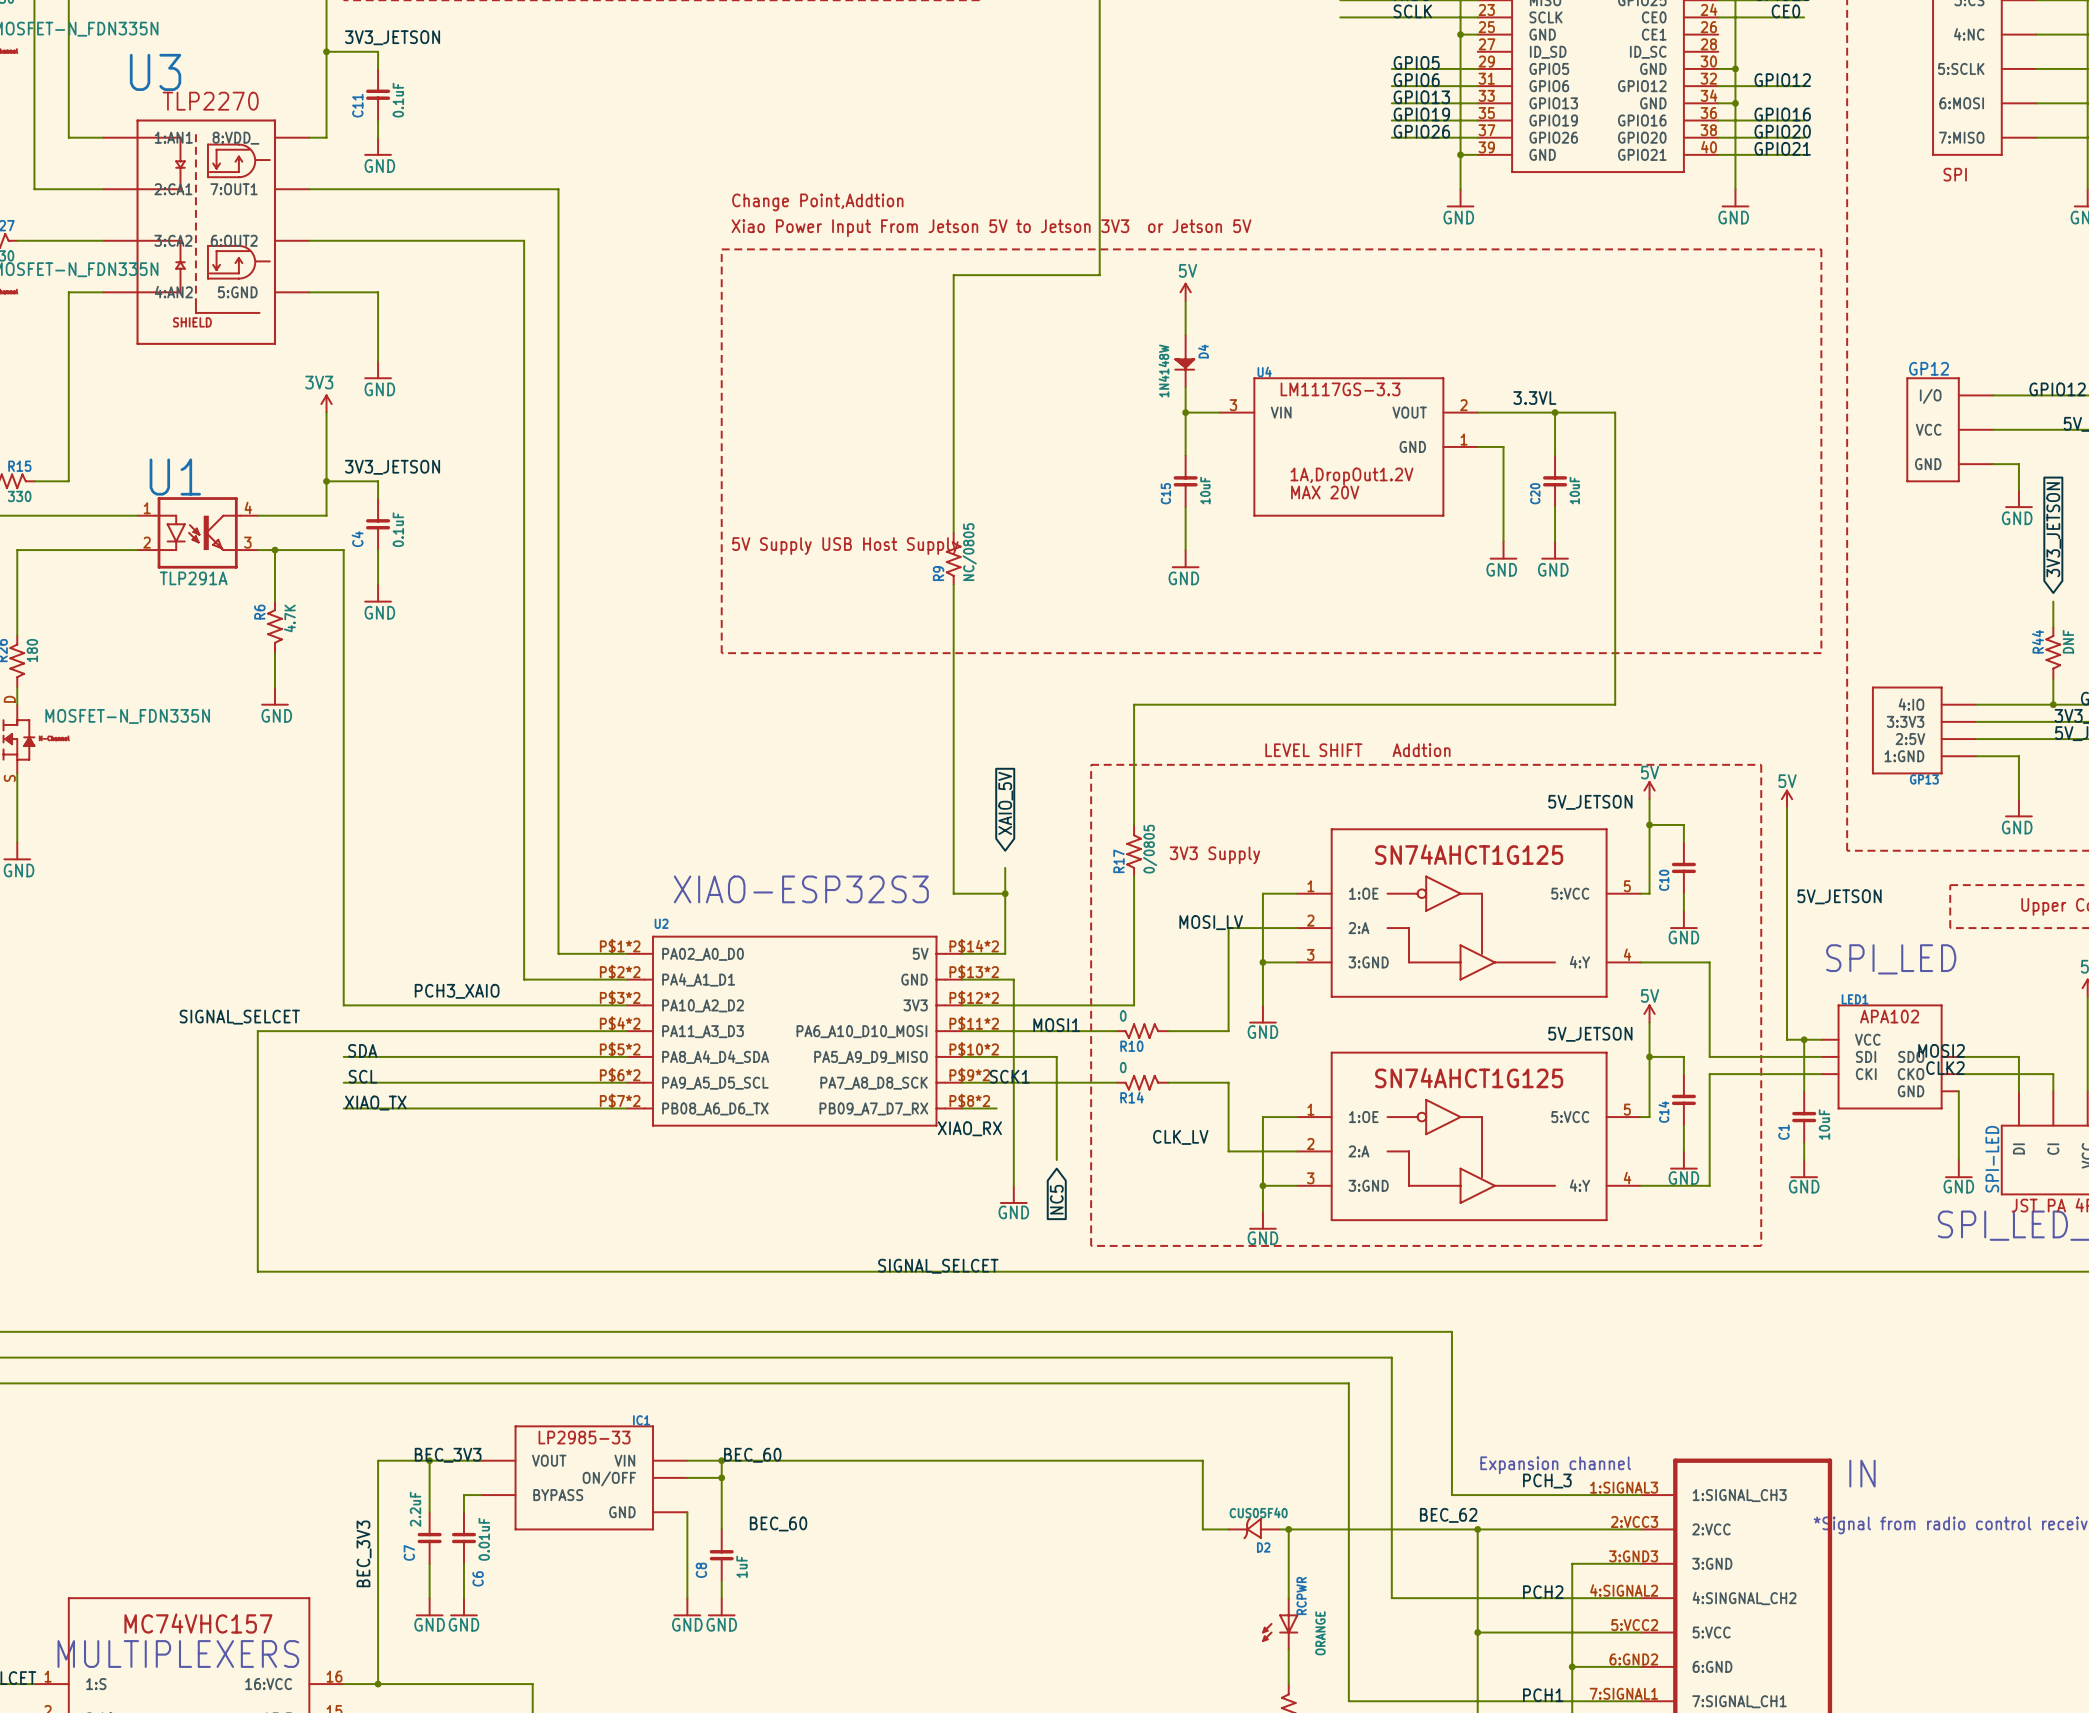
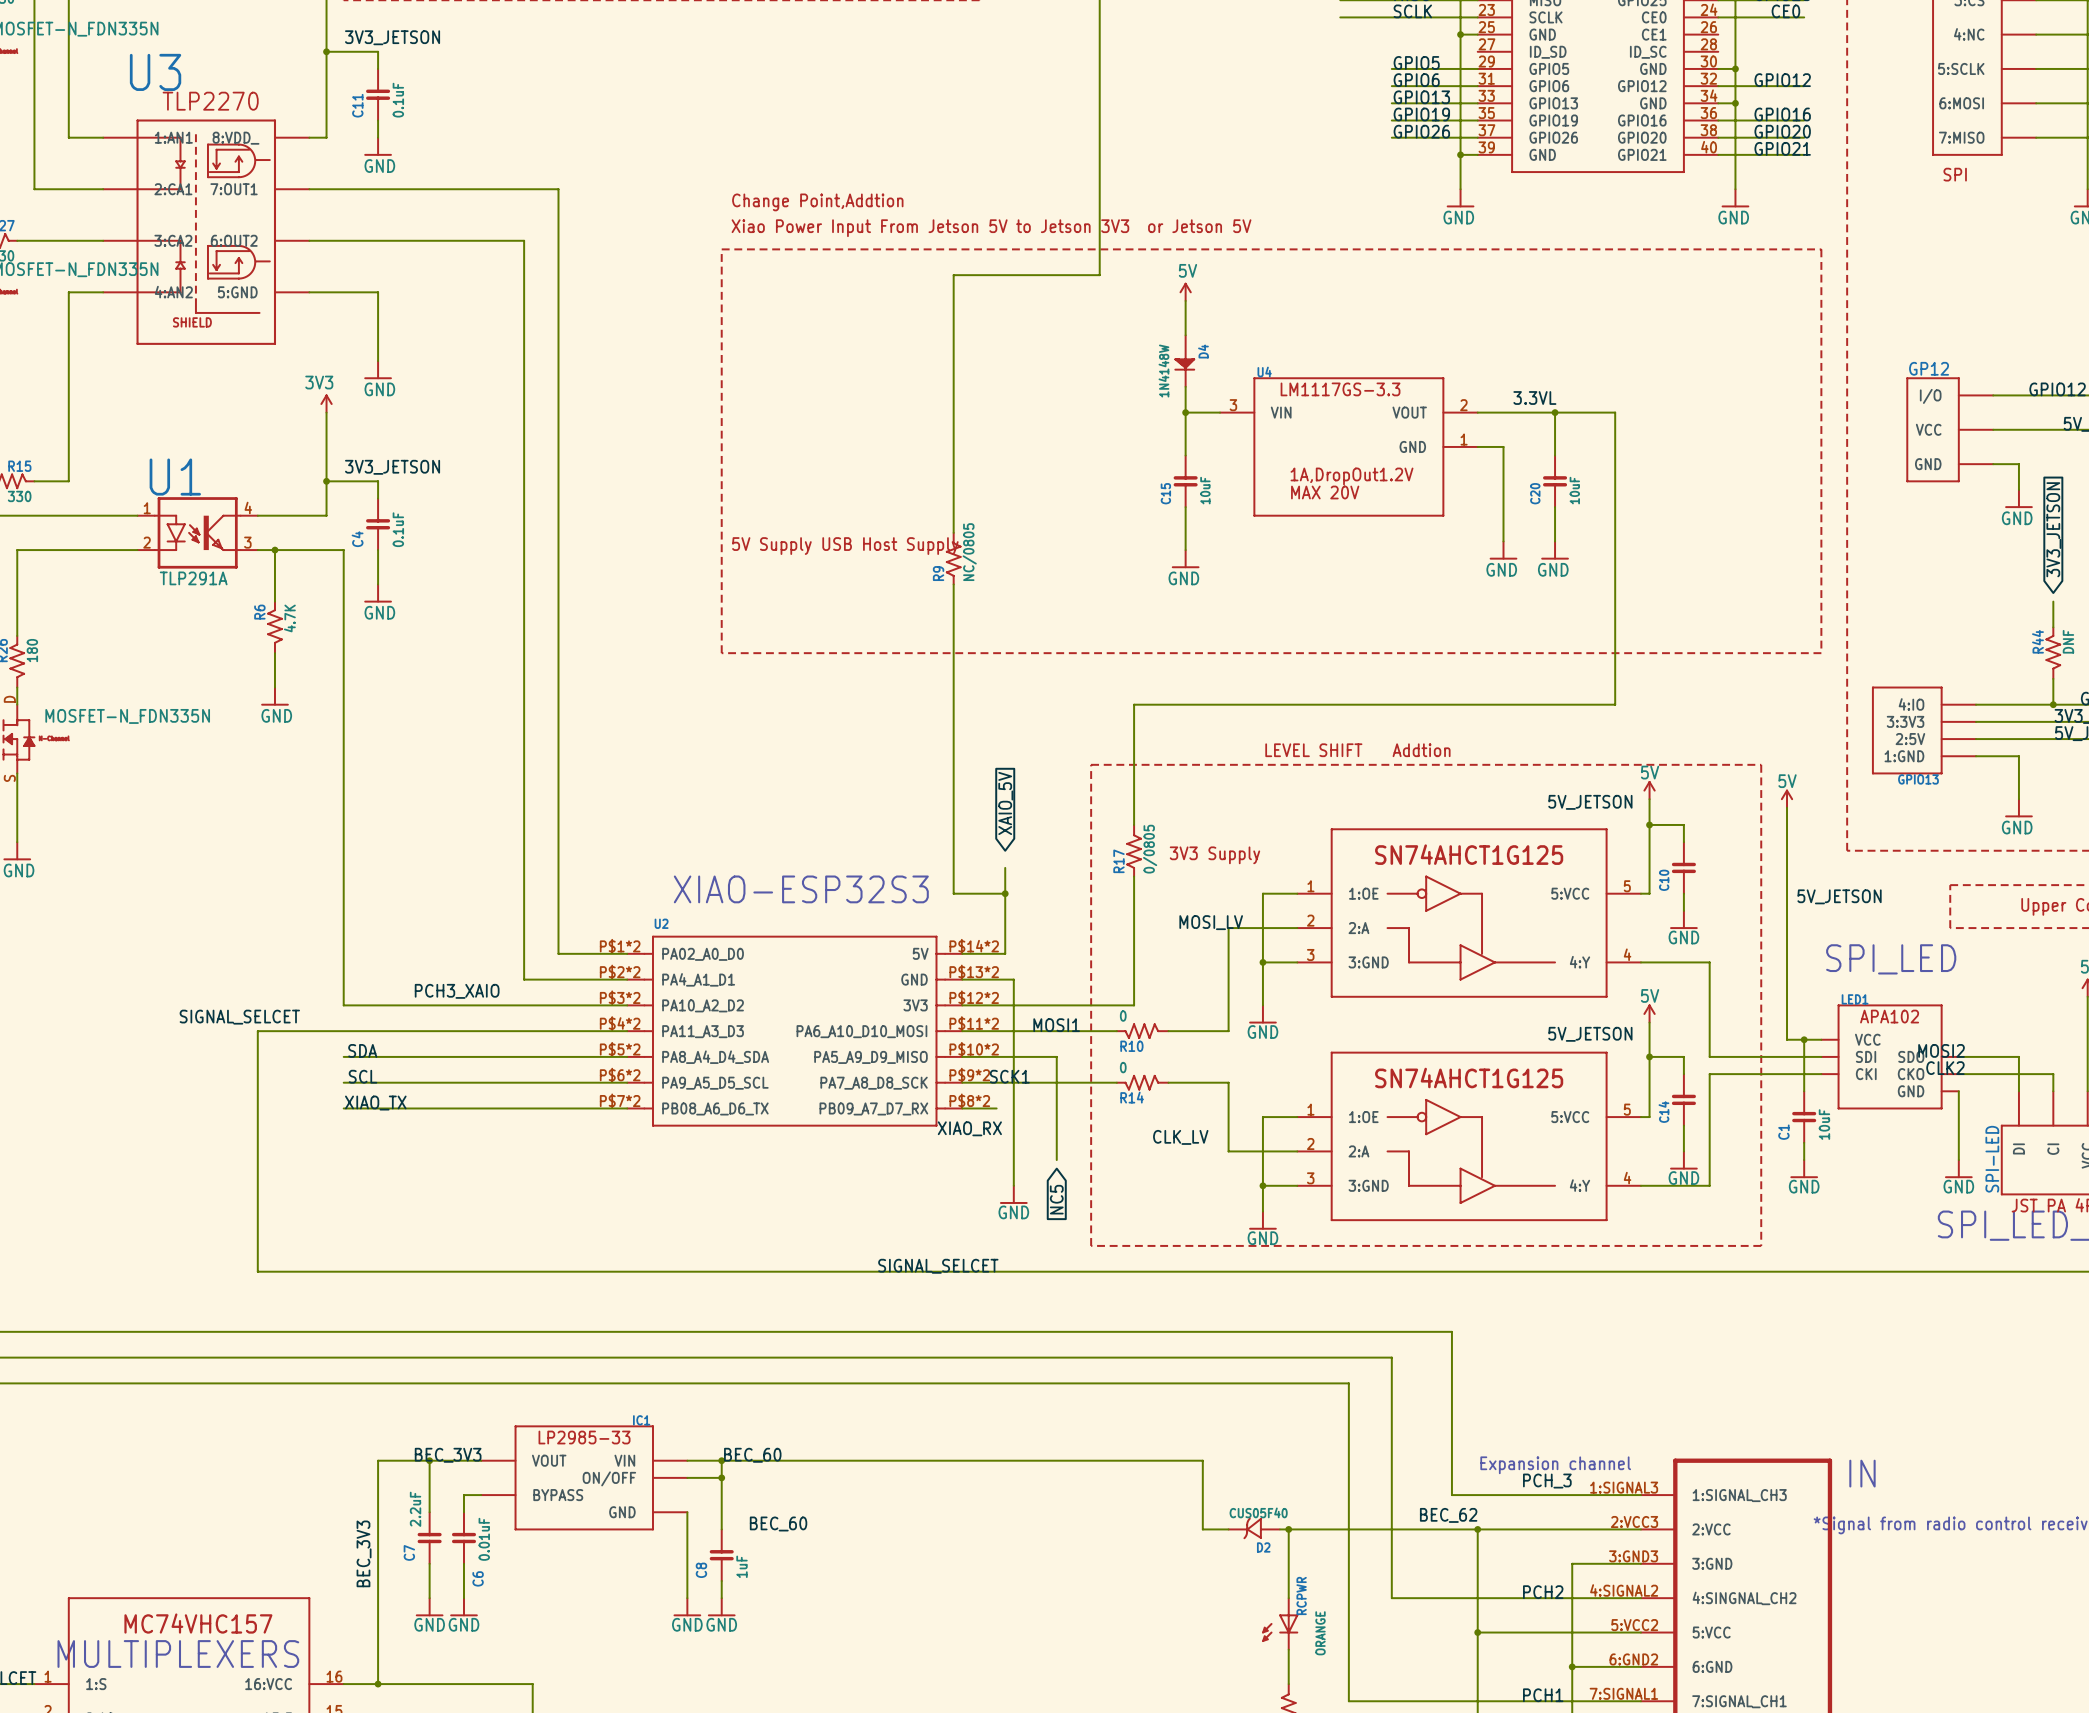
GP13 name: GP13 (1924, 779) -> GPIO13 (1918, 779)

